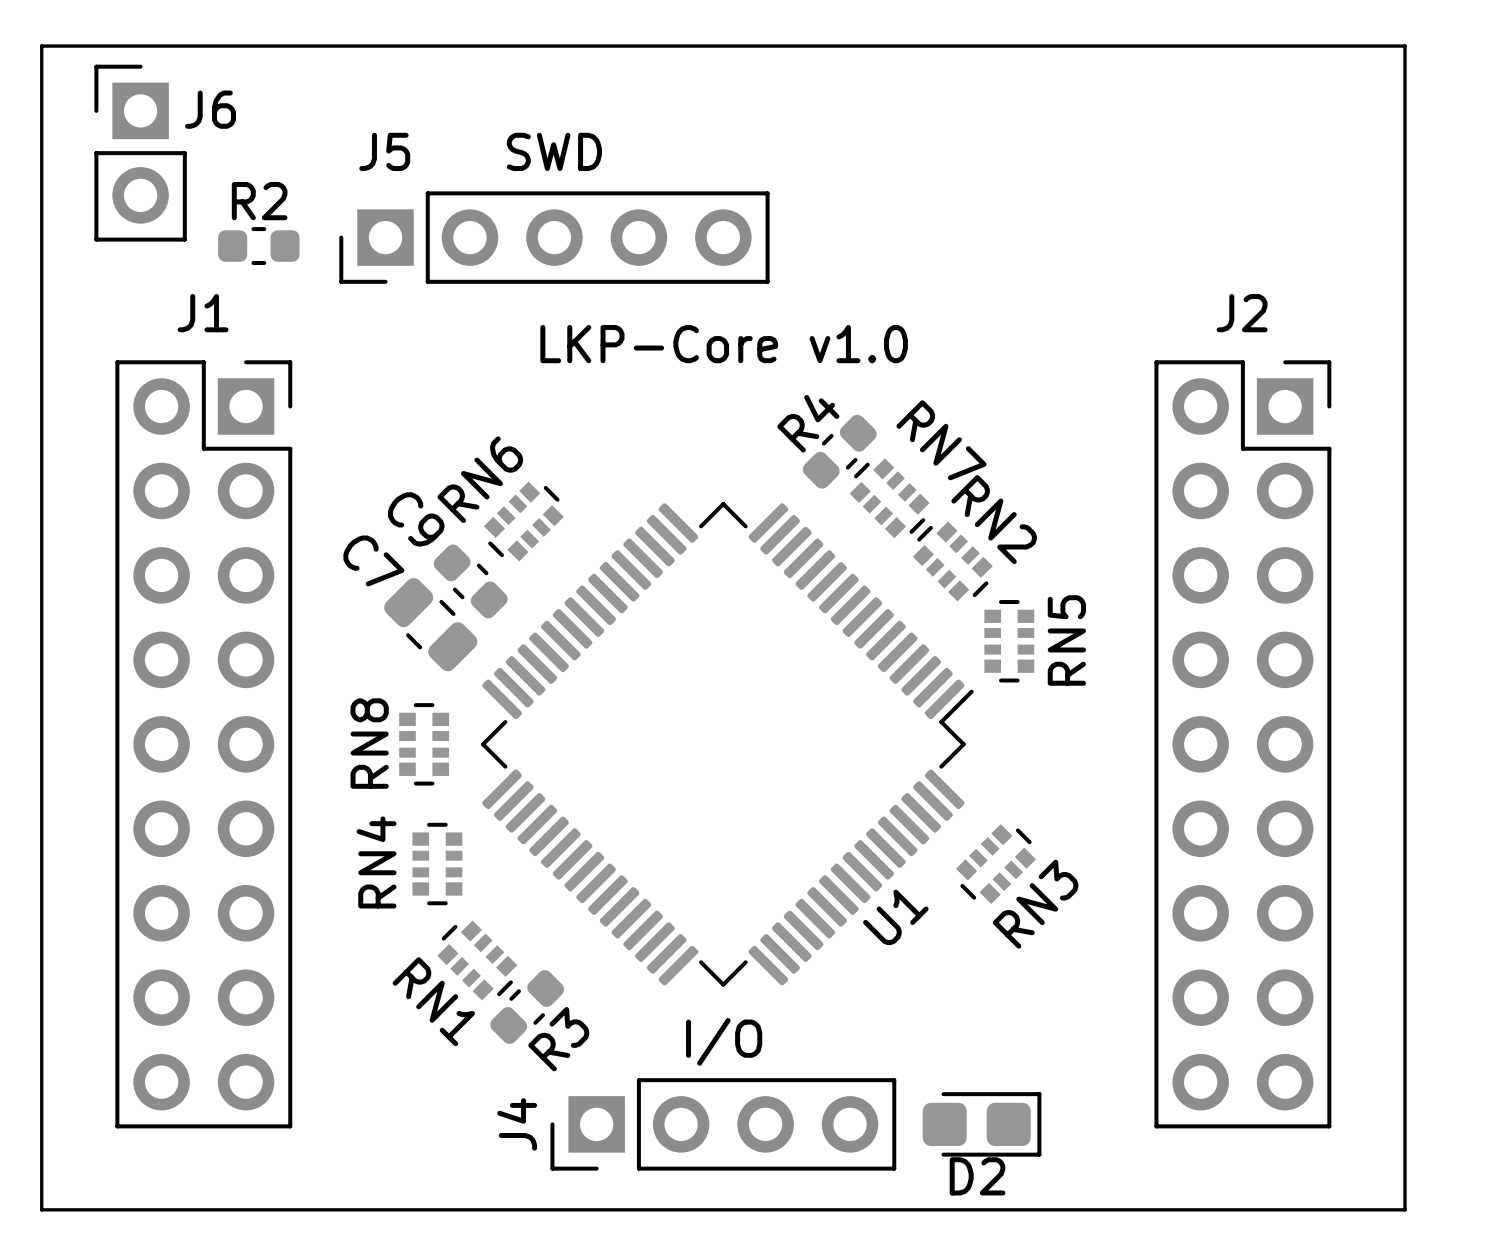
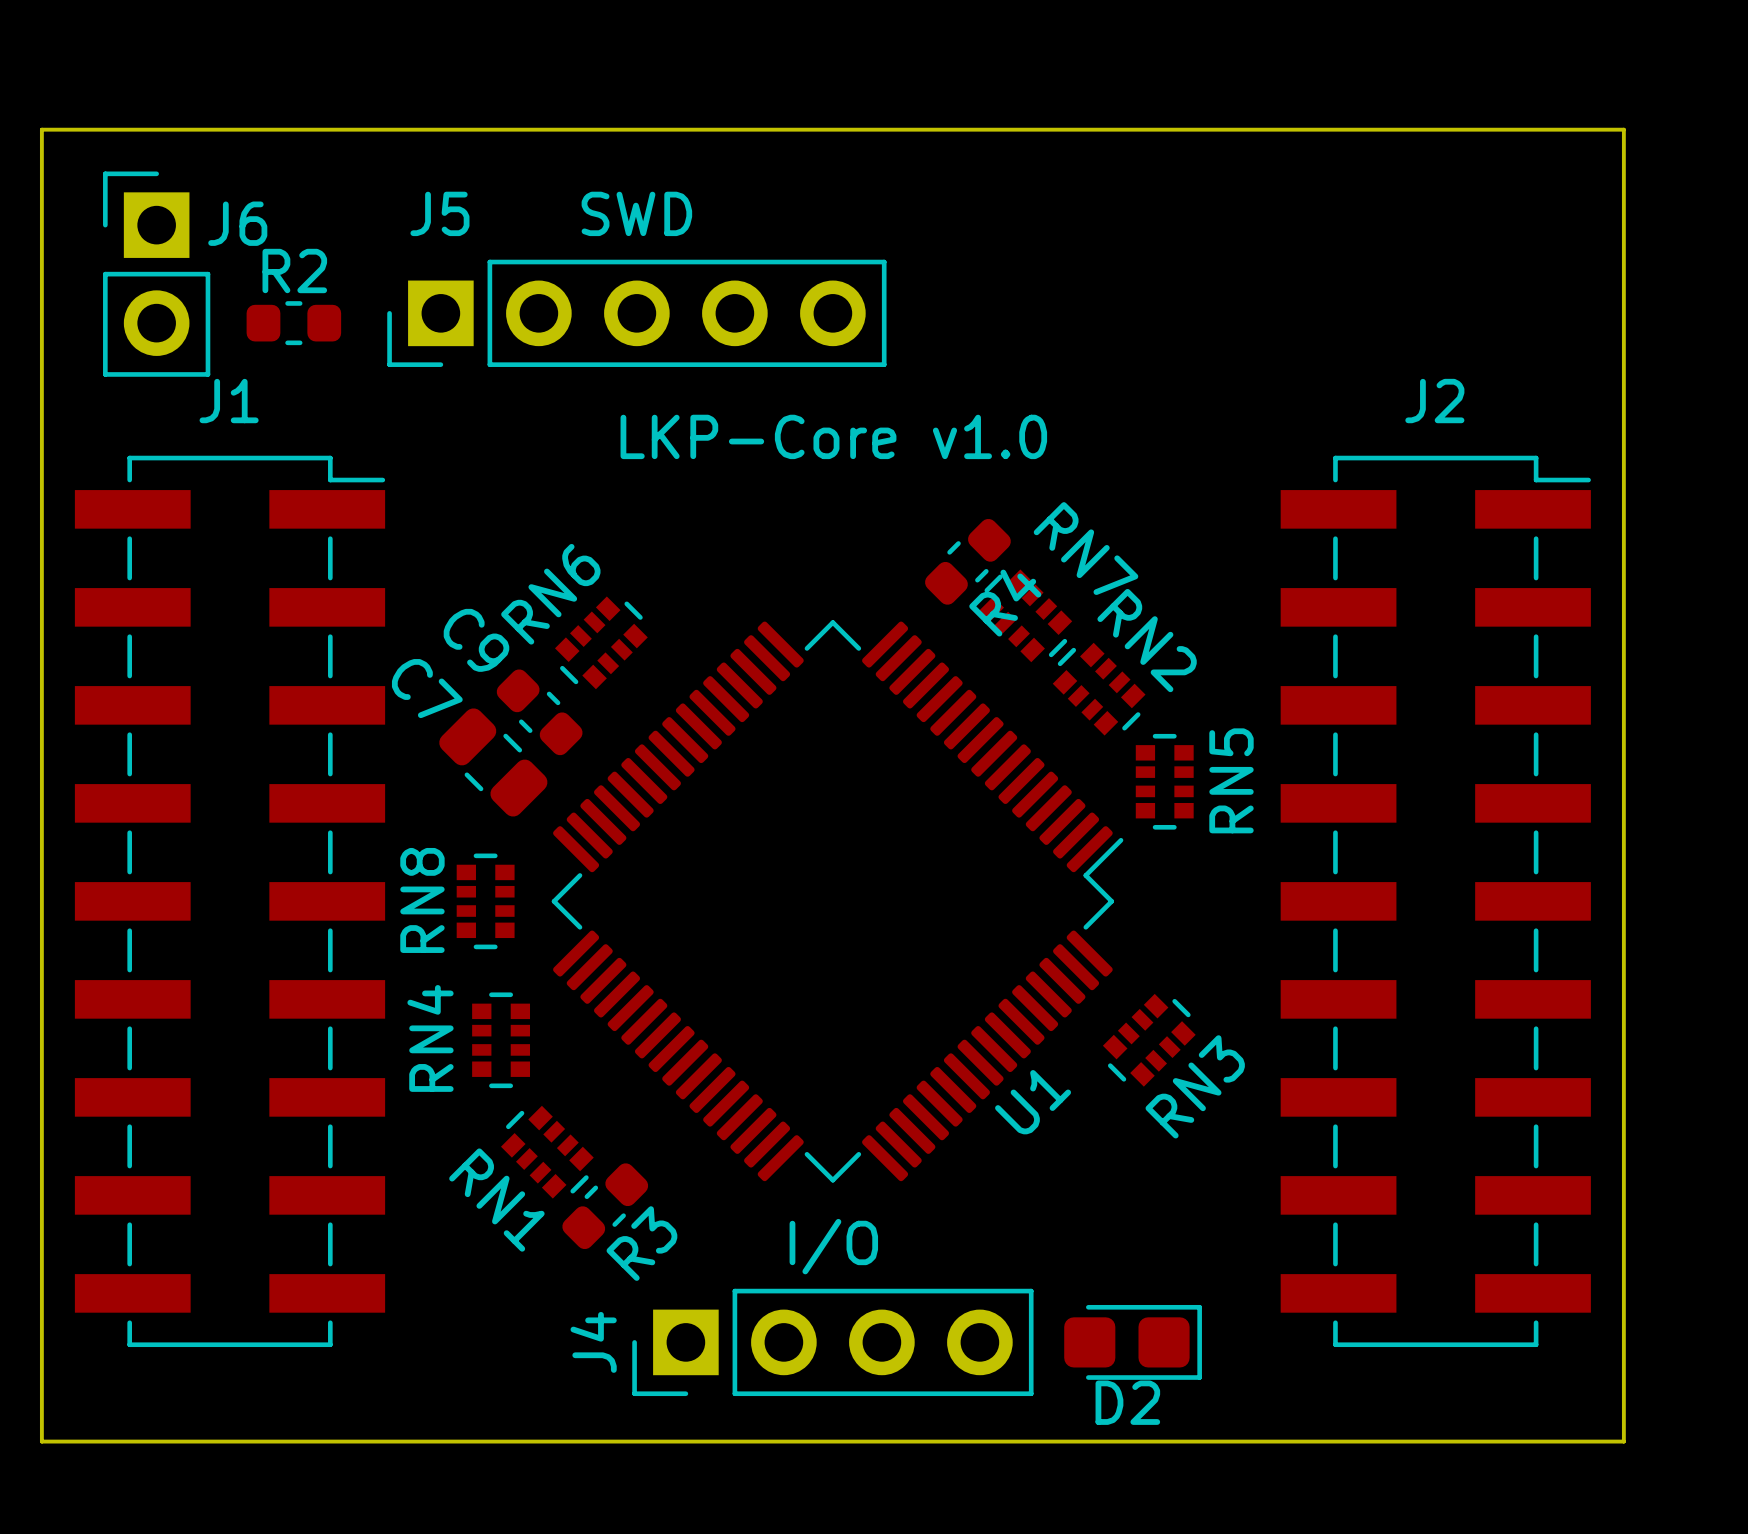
board edge: (41, 79) (41, 46) (1405, 46) (1405, 79) -> (41, 129) (1623, 129)
J6 position: (140, 153) -> (156, 274)
J1 footprint: [115, 360, 293, 1129] -> [74, 455, 386, 1348]
J2 footprint: [1154, 360, 1332, 1129] -> [1280, 455, 1591, 1348]
R4 name position: R4 (808, 423) -> R4 (1005, 603)

